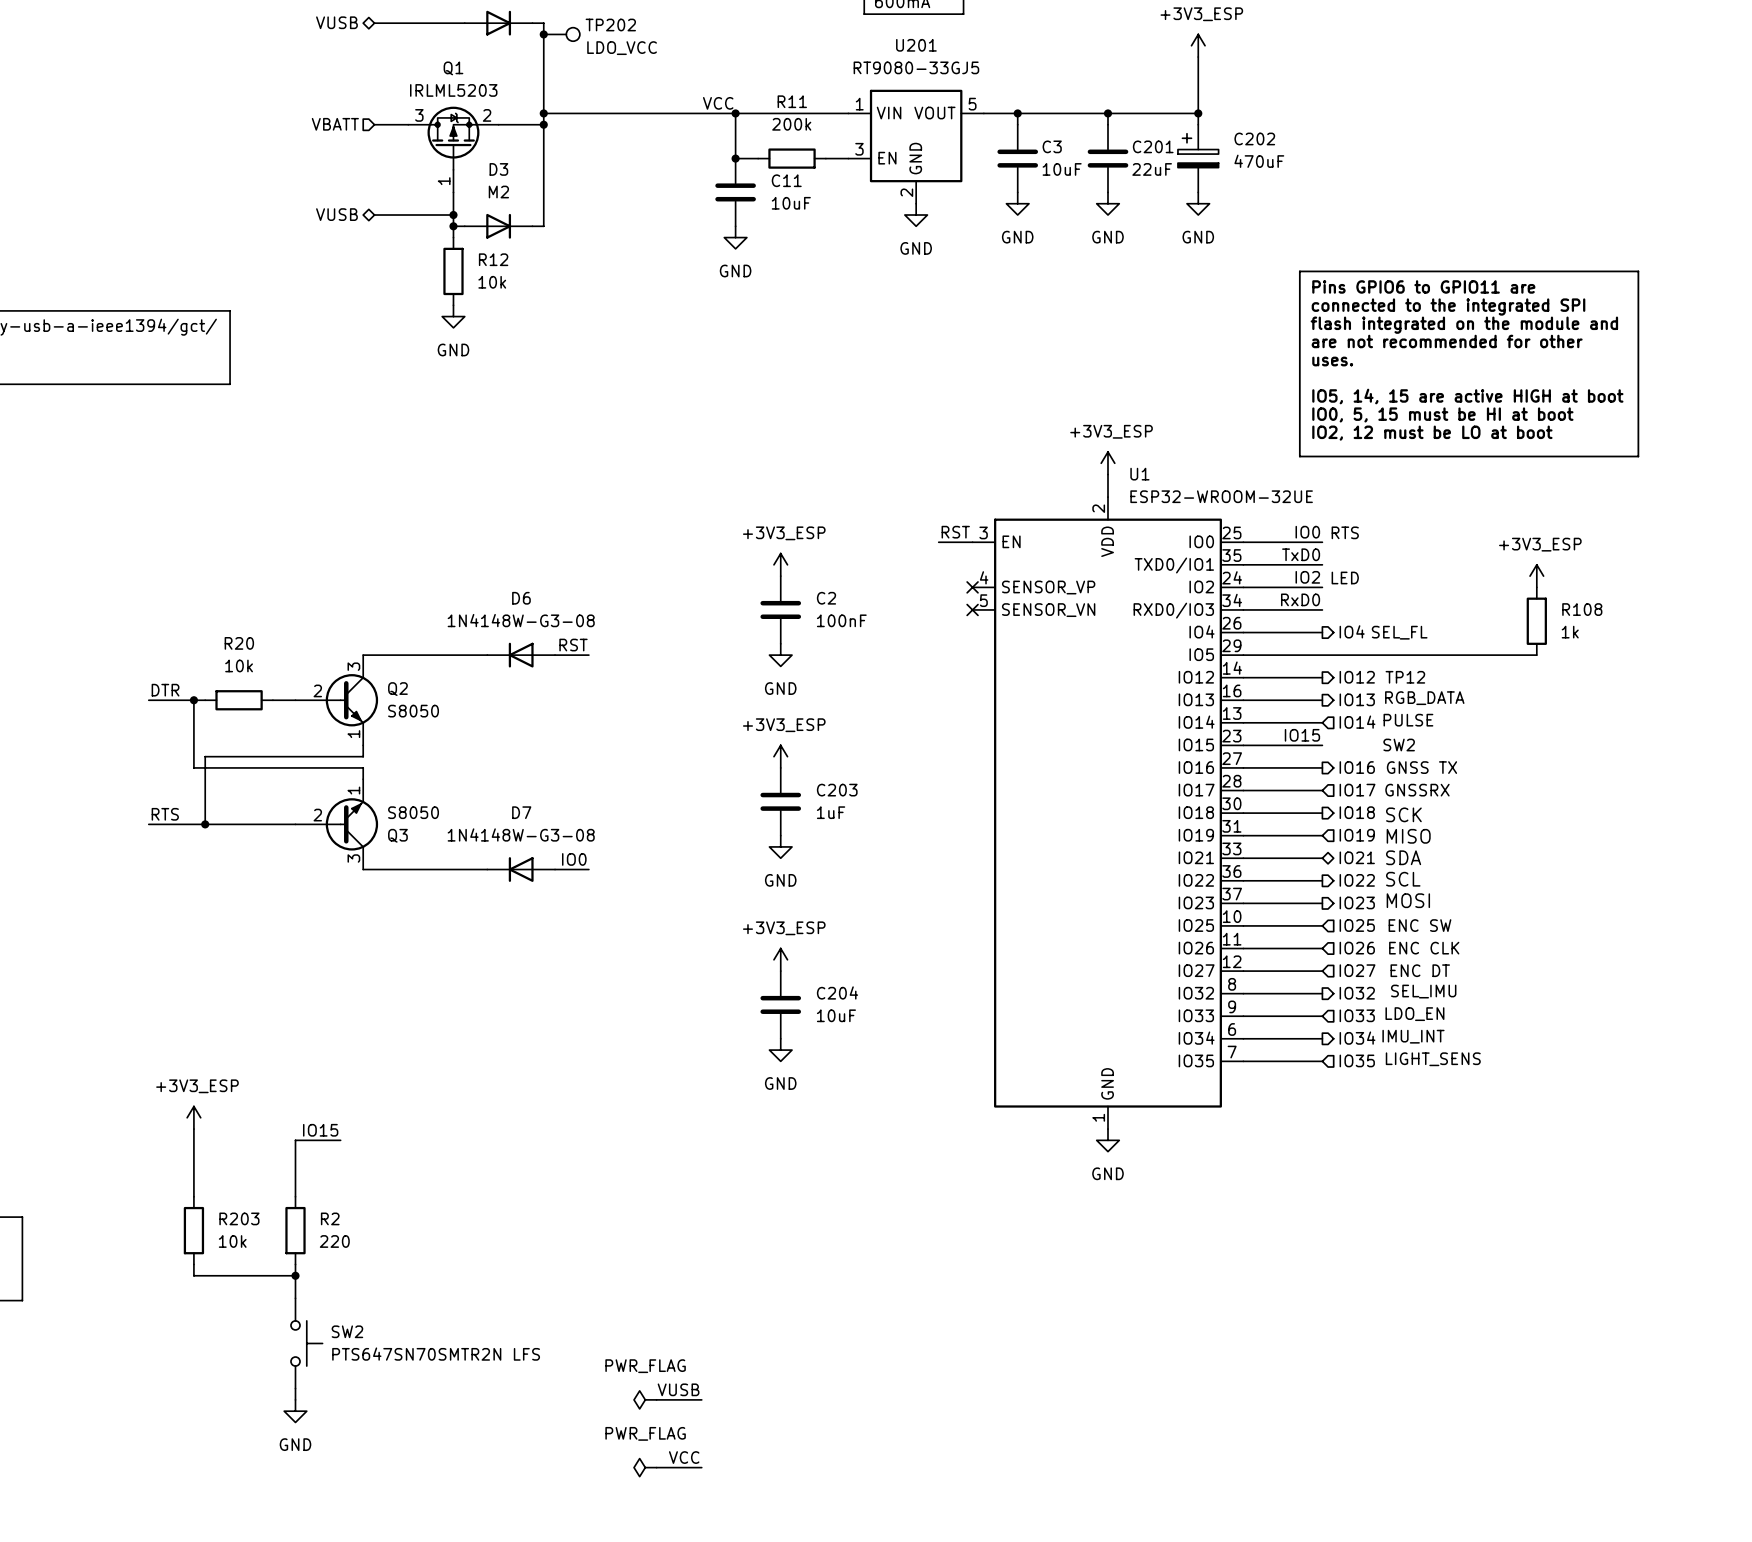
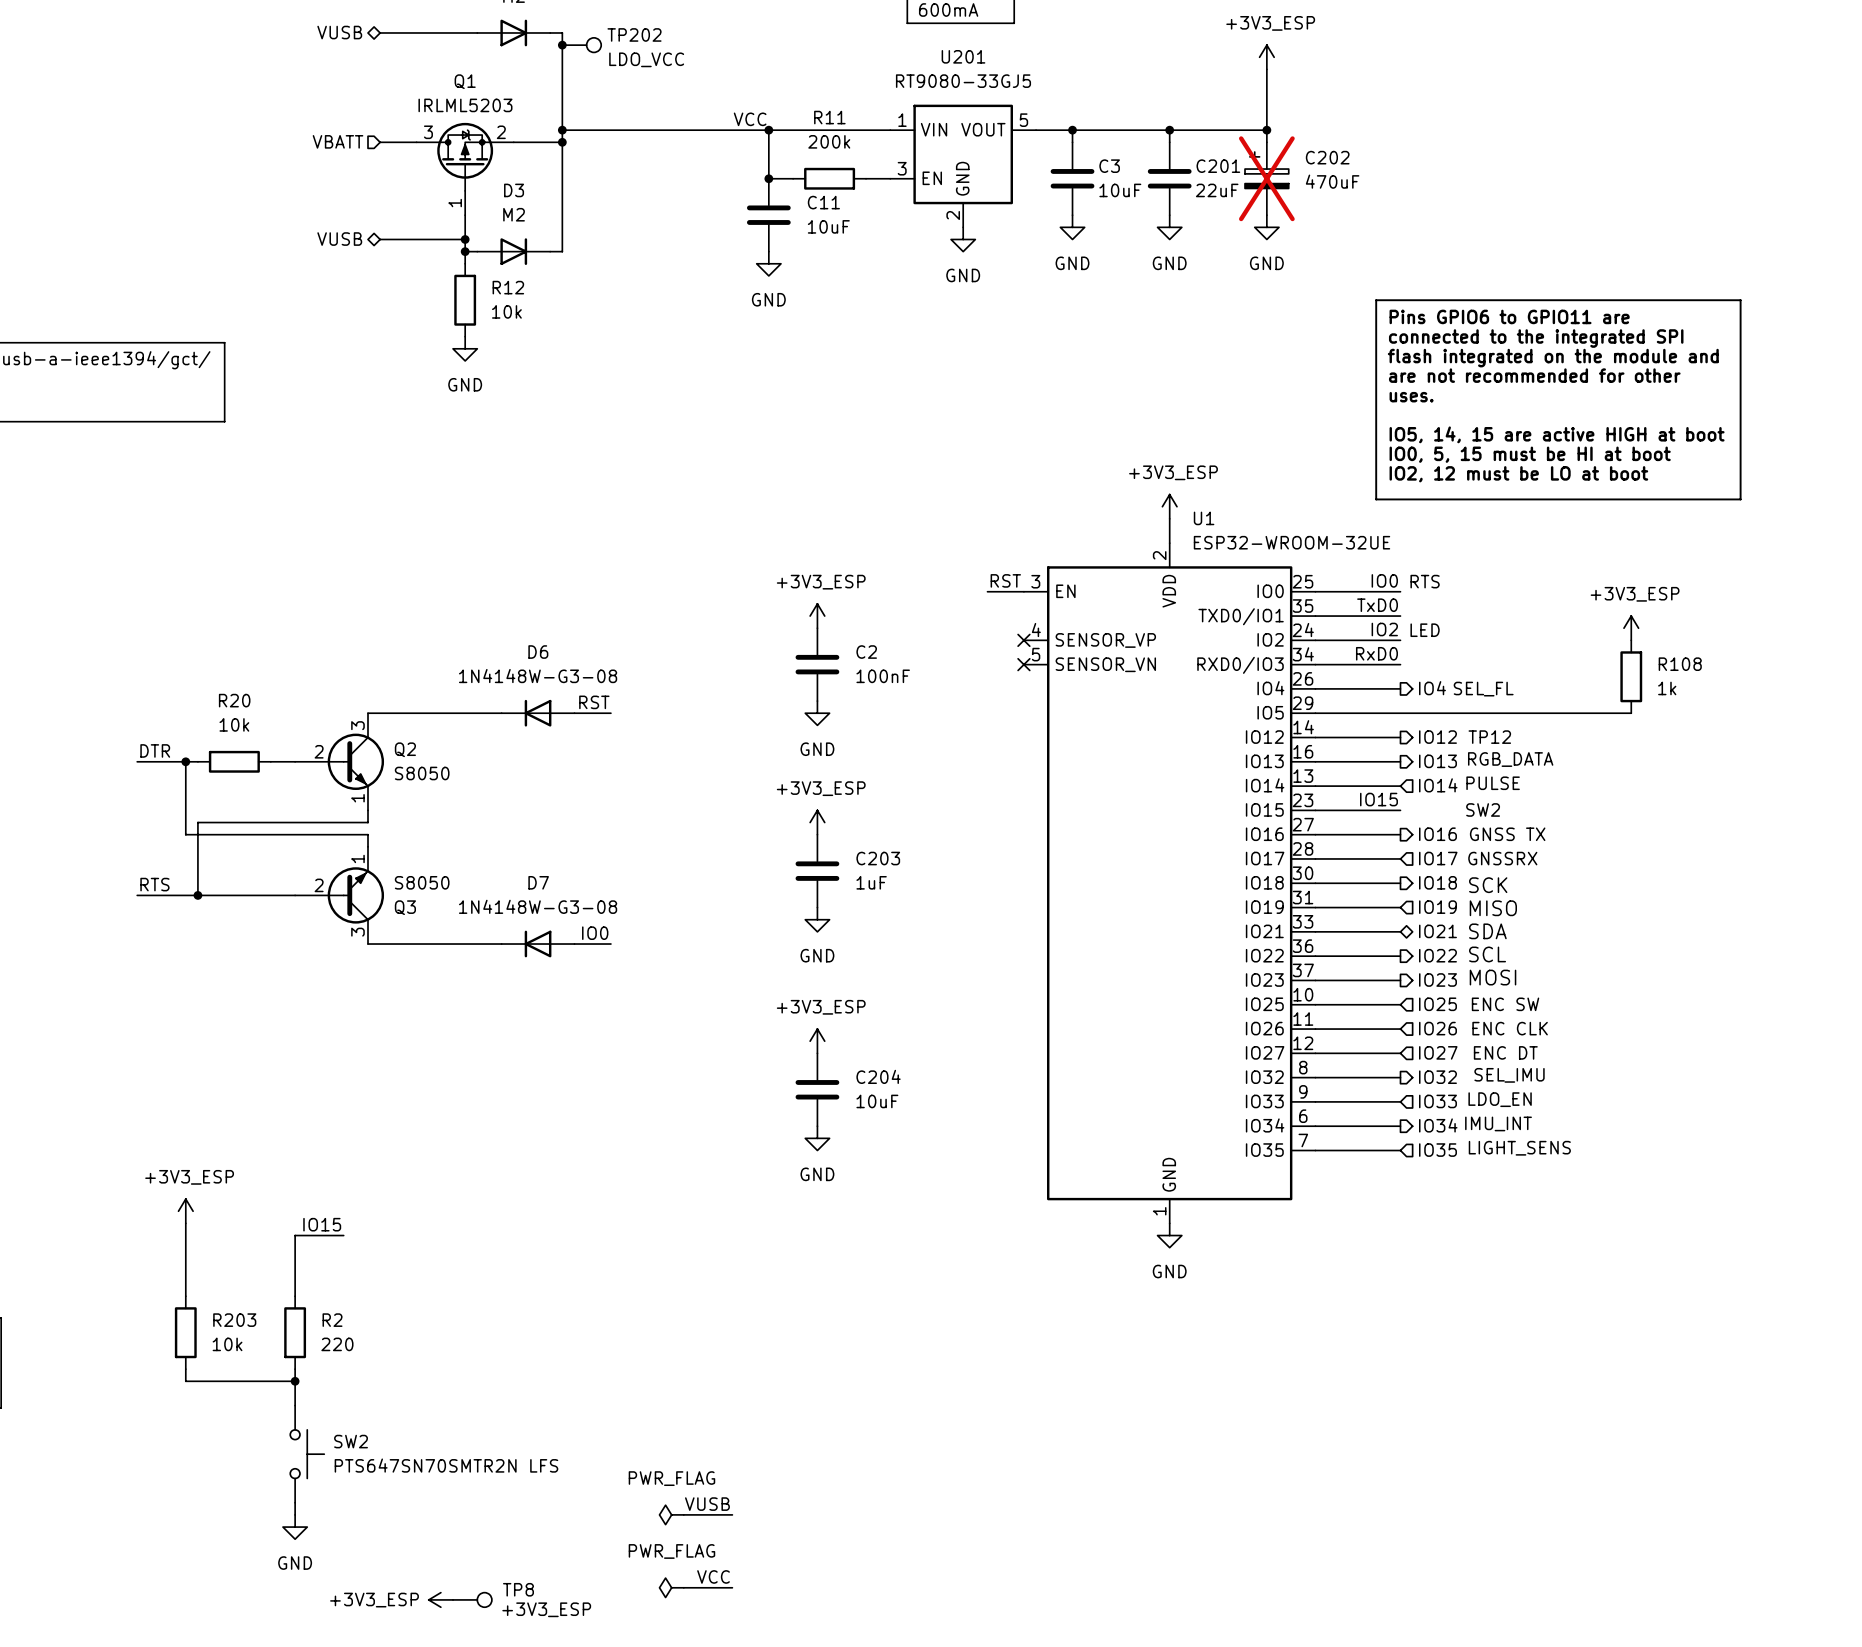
C202 do-not-place cross: none -> (1266, 178)
power symbol: none -> +3V3_ESP (440, 1599)
TP8: none -> +3V3_ESP (472, 1599)

